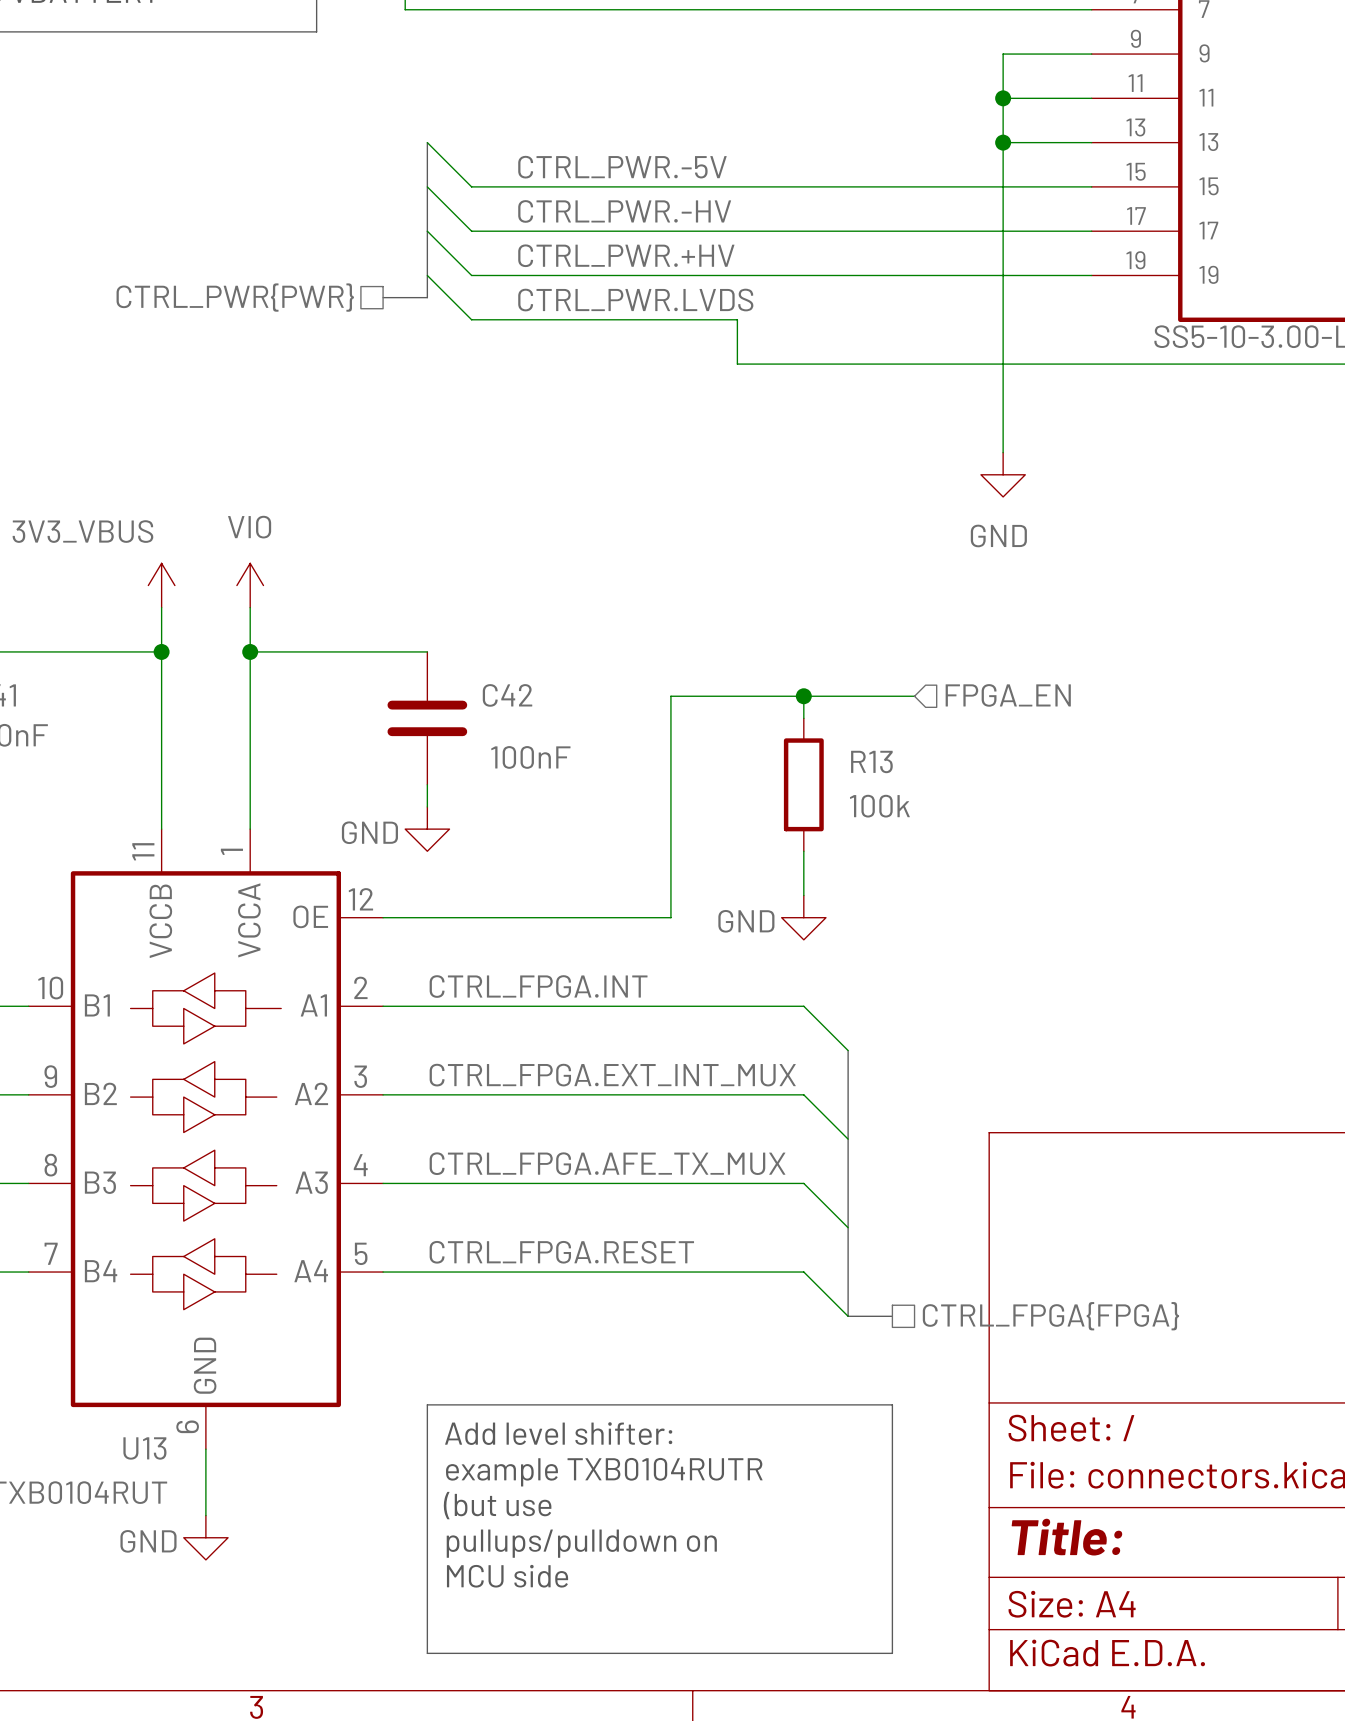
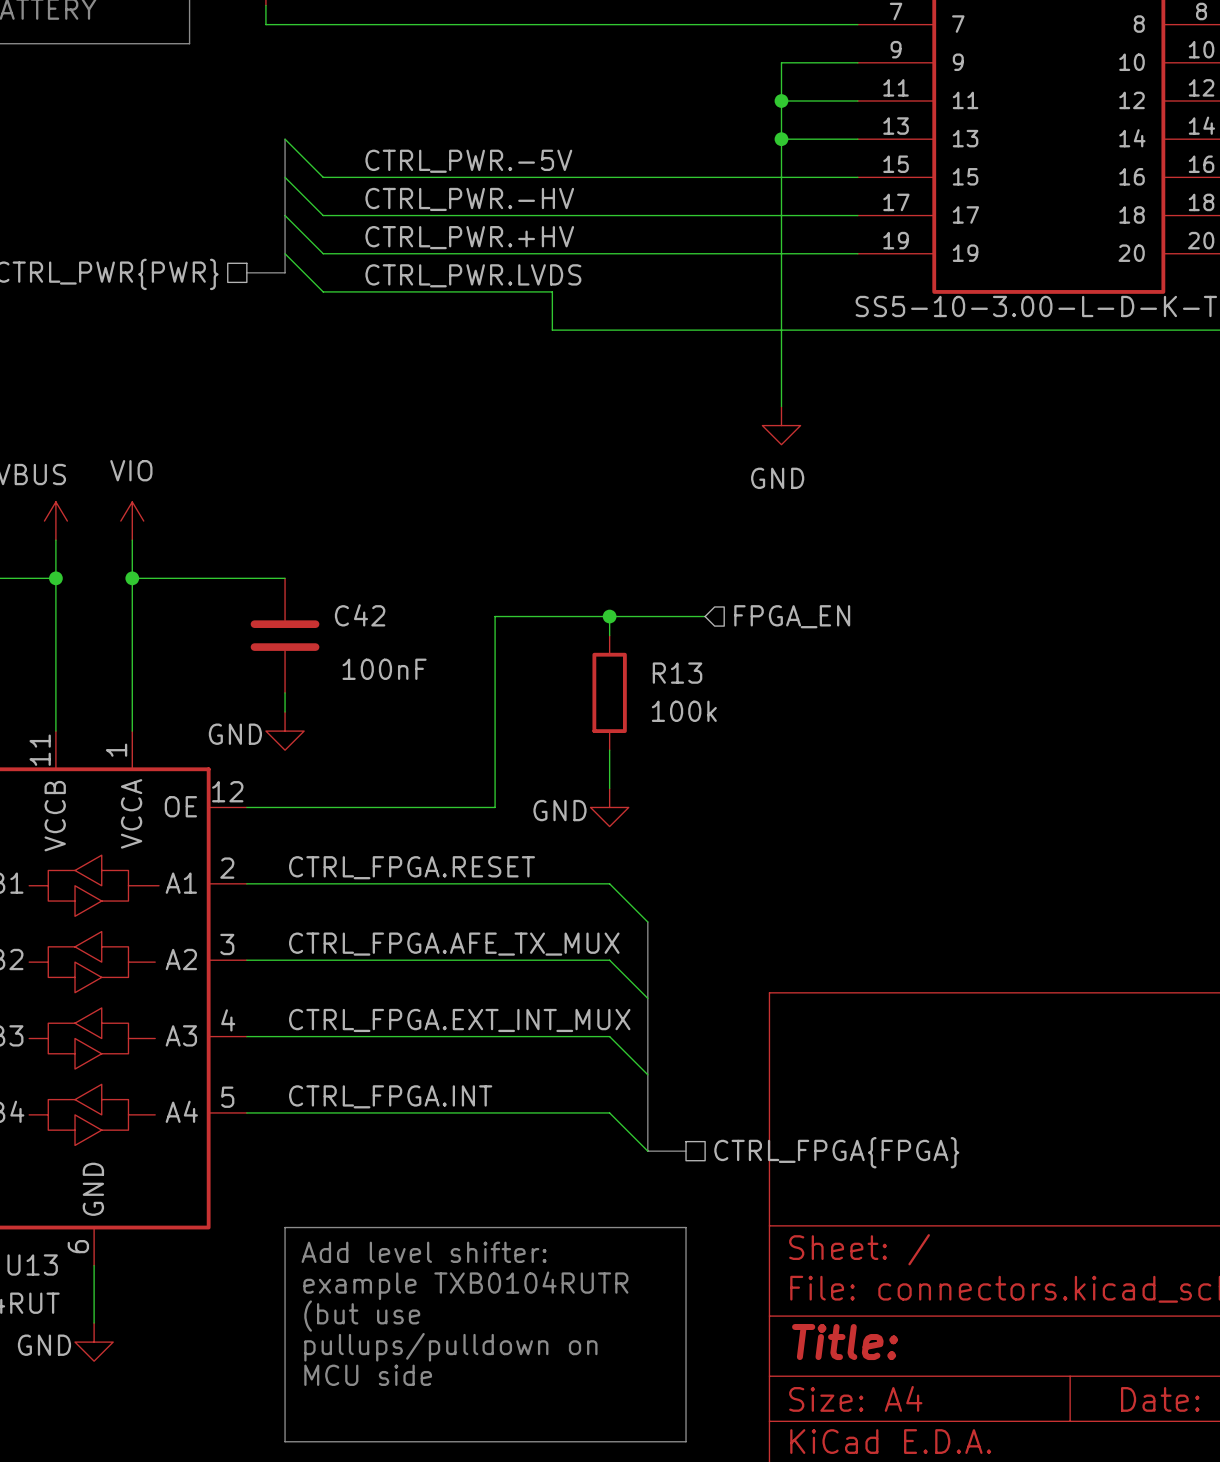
label: CTRL_FPGA.INT (538, 986) -> CTRL_FPGA.RESET (412, 867)
label: CTRL_FPGA.EXT_INT_MUX (612, 1075) -> CTRL_FPGA.AFE_TX_MUX (454, 944)
label: CTRL_FPGA.AFE_TX_MUX (607, 1163) -> CTRL_FPGA.EXT_INT_MUX (459, 1020)
label: CTRL_FPGA.RESET (561, 1252) -> CTRL_FPGA.INT (390, 1096)

